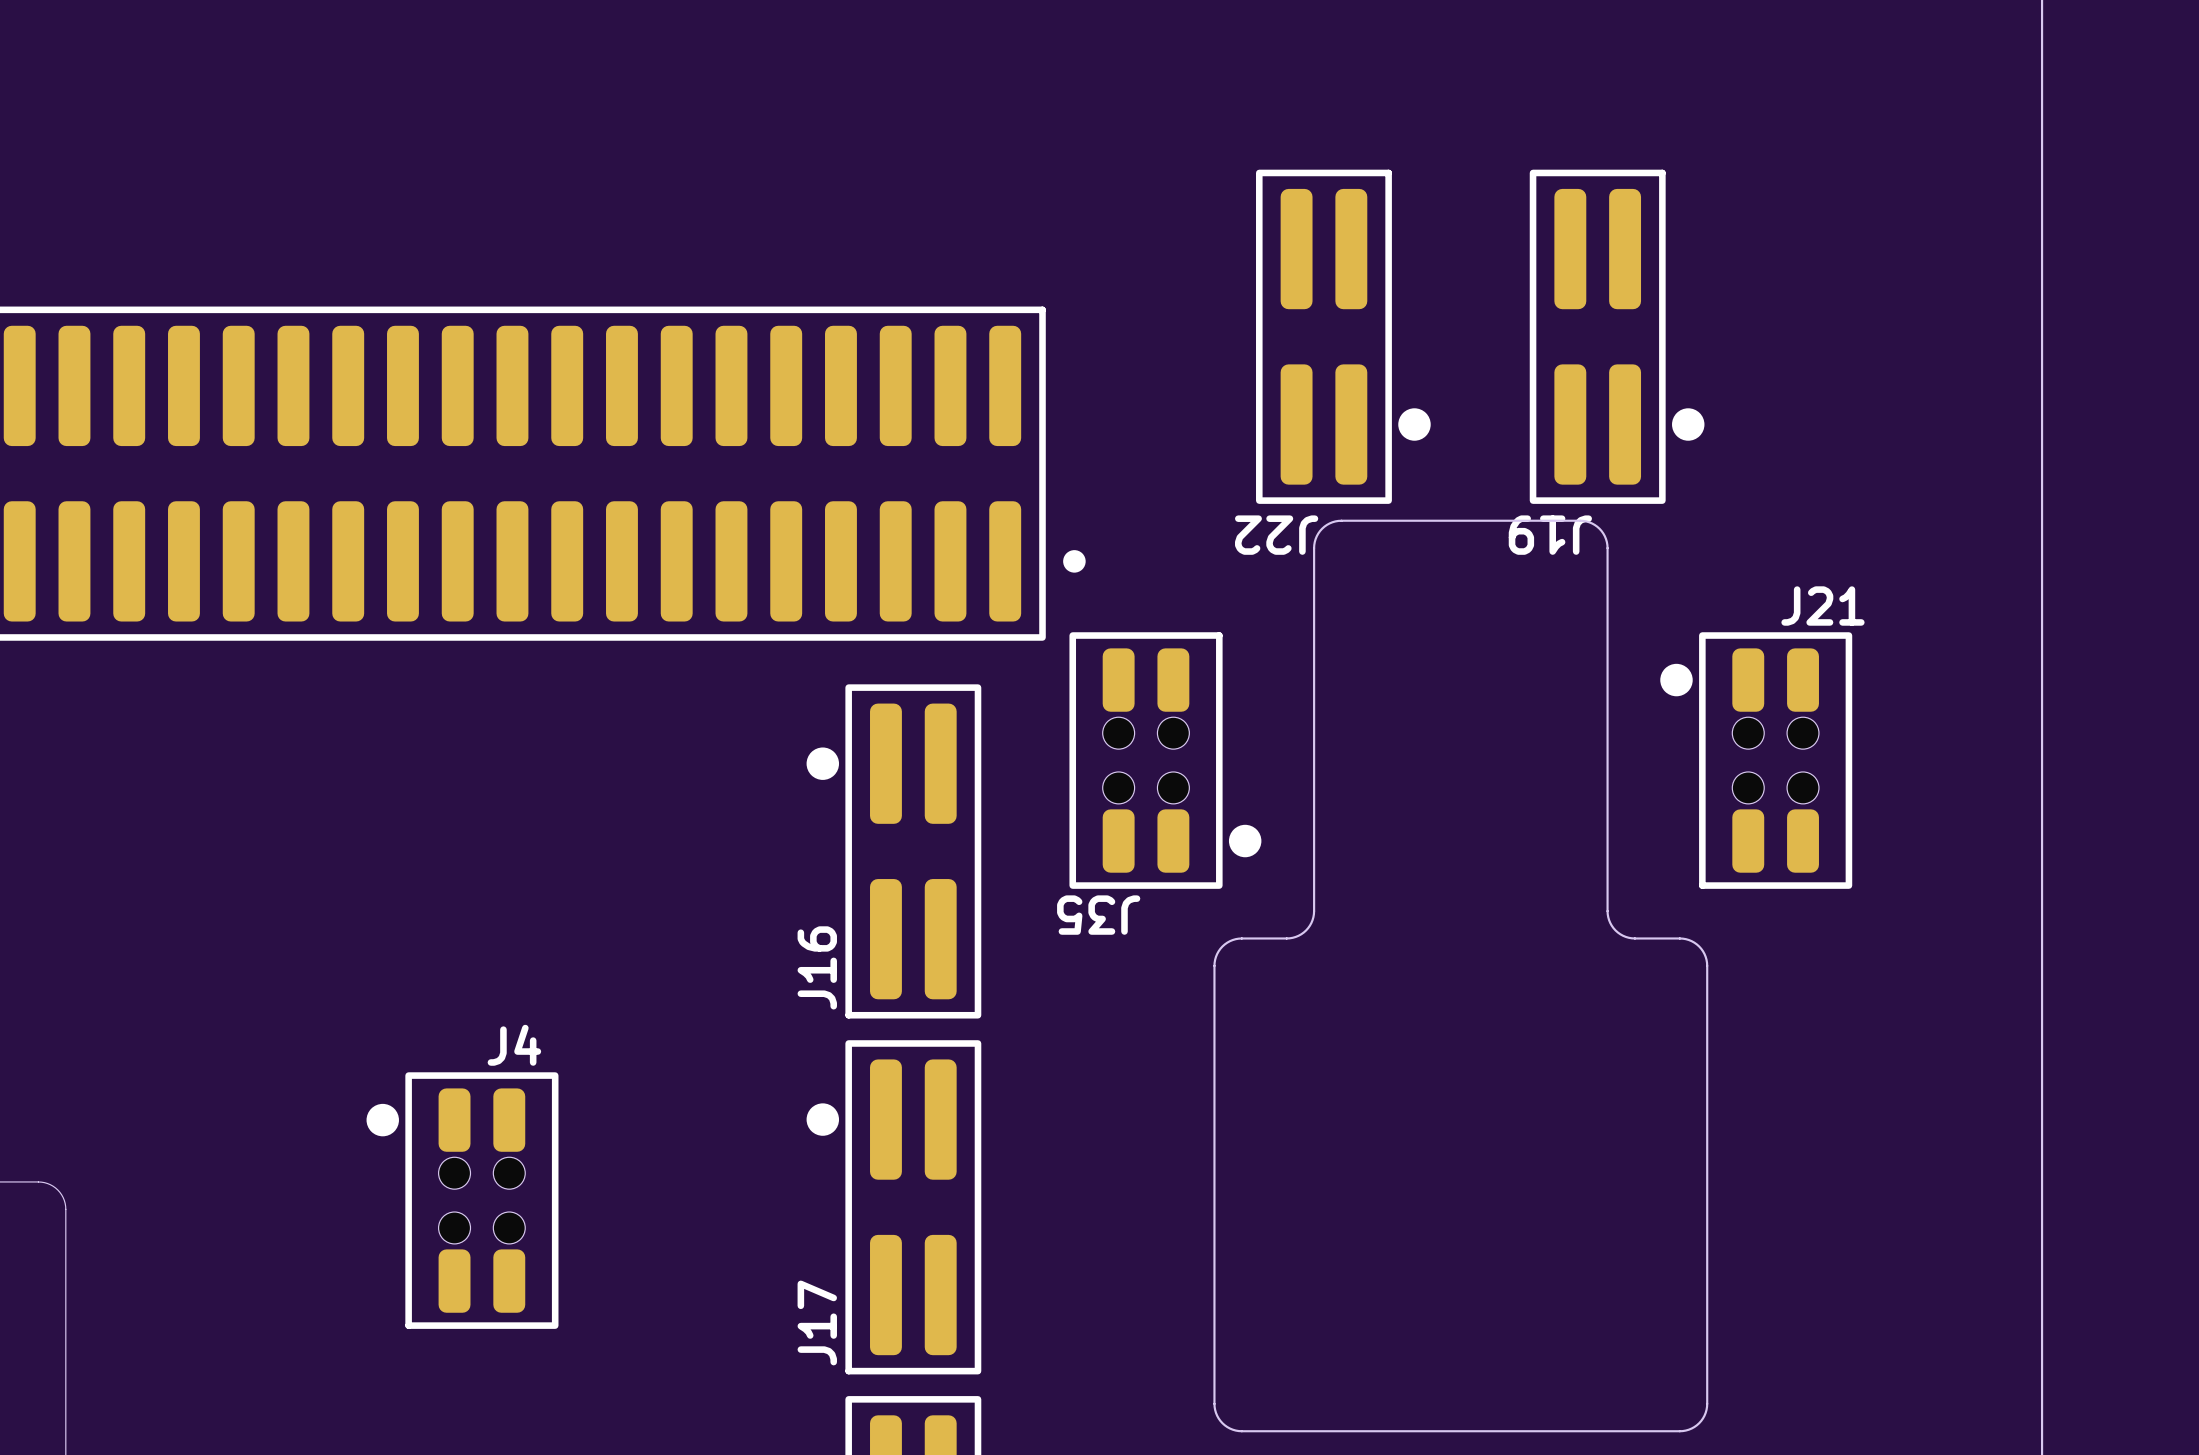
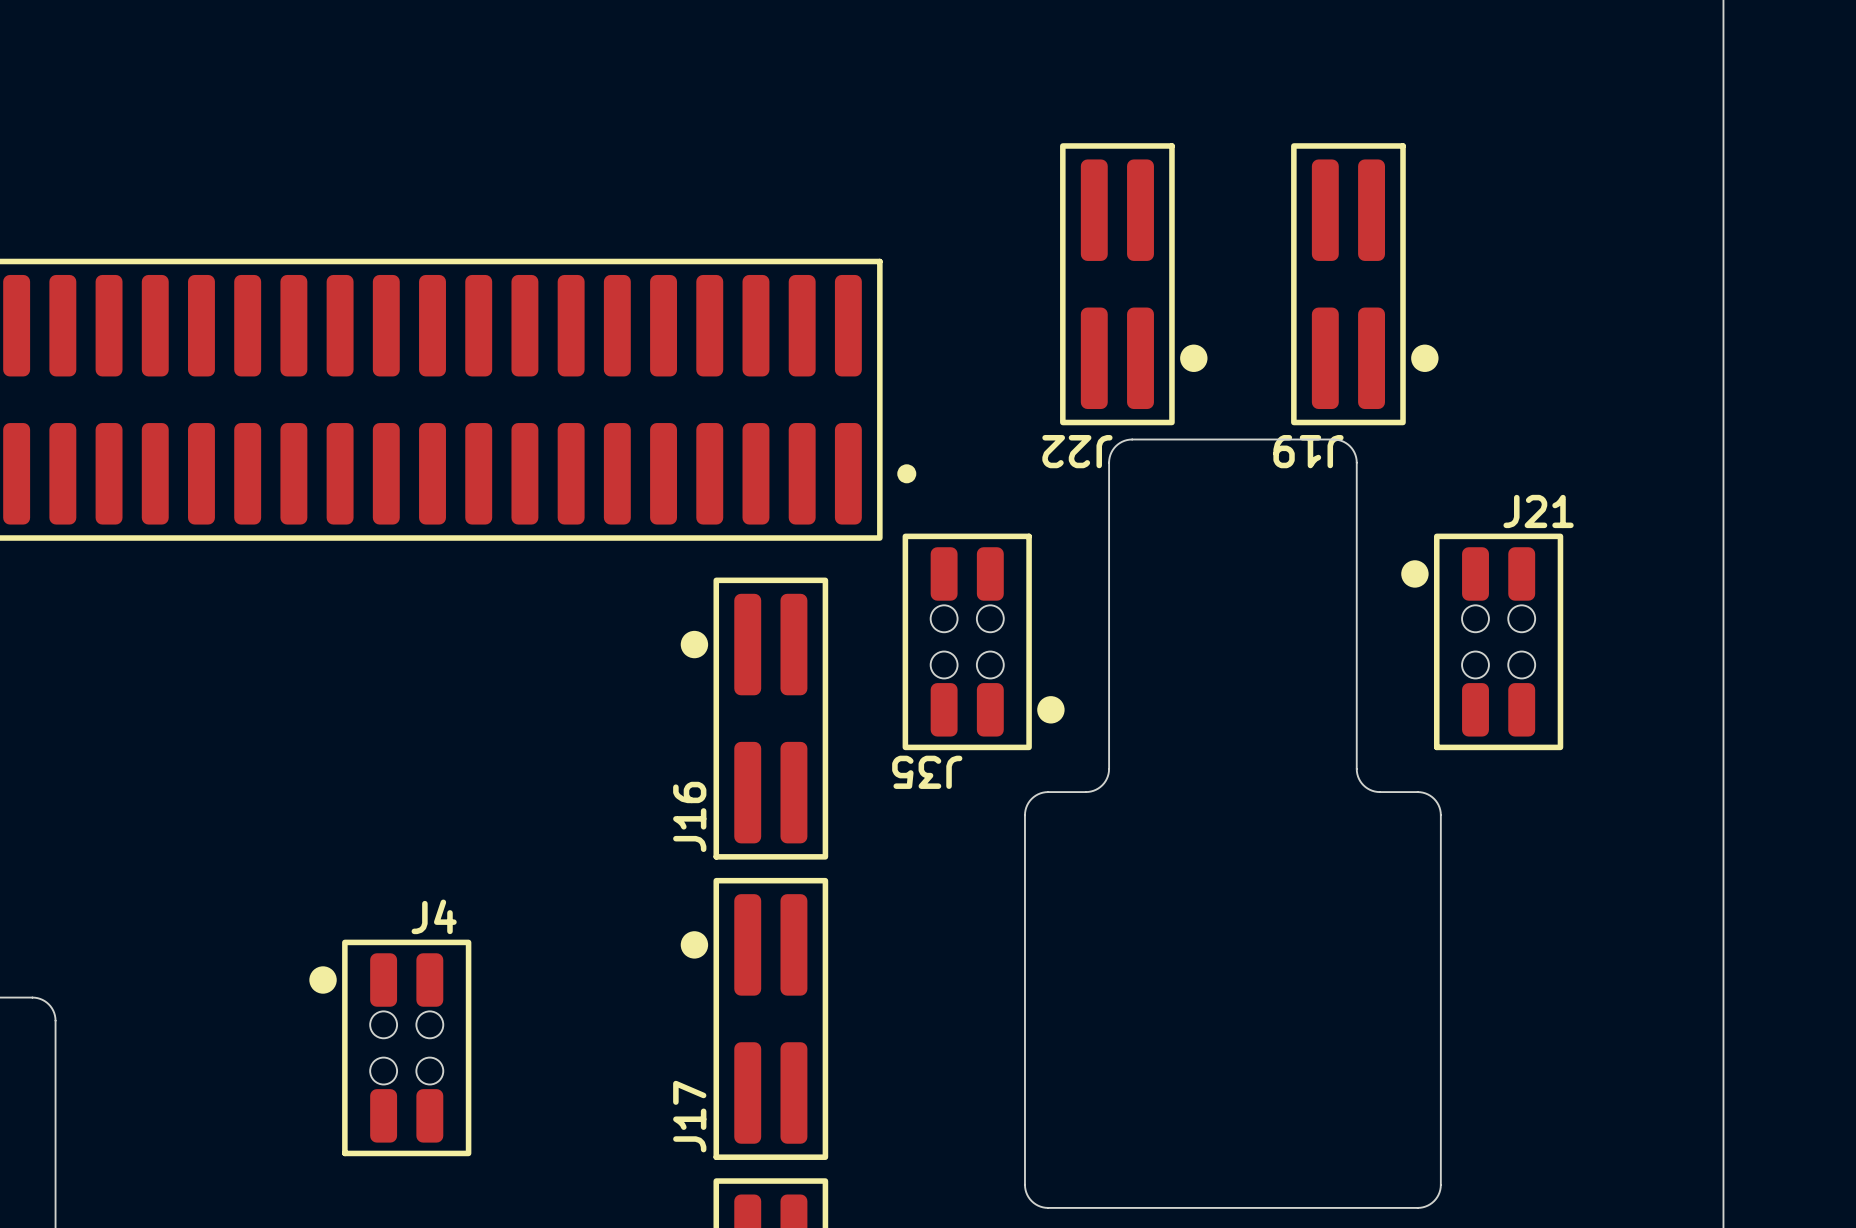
J4 position: (462, 1200) -> (390, 1047)

